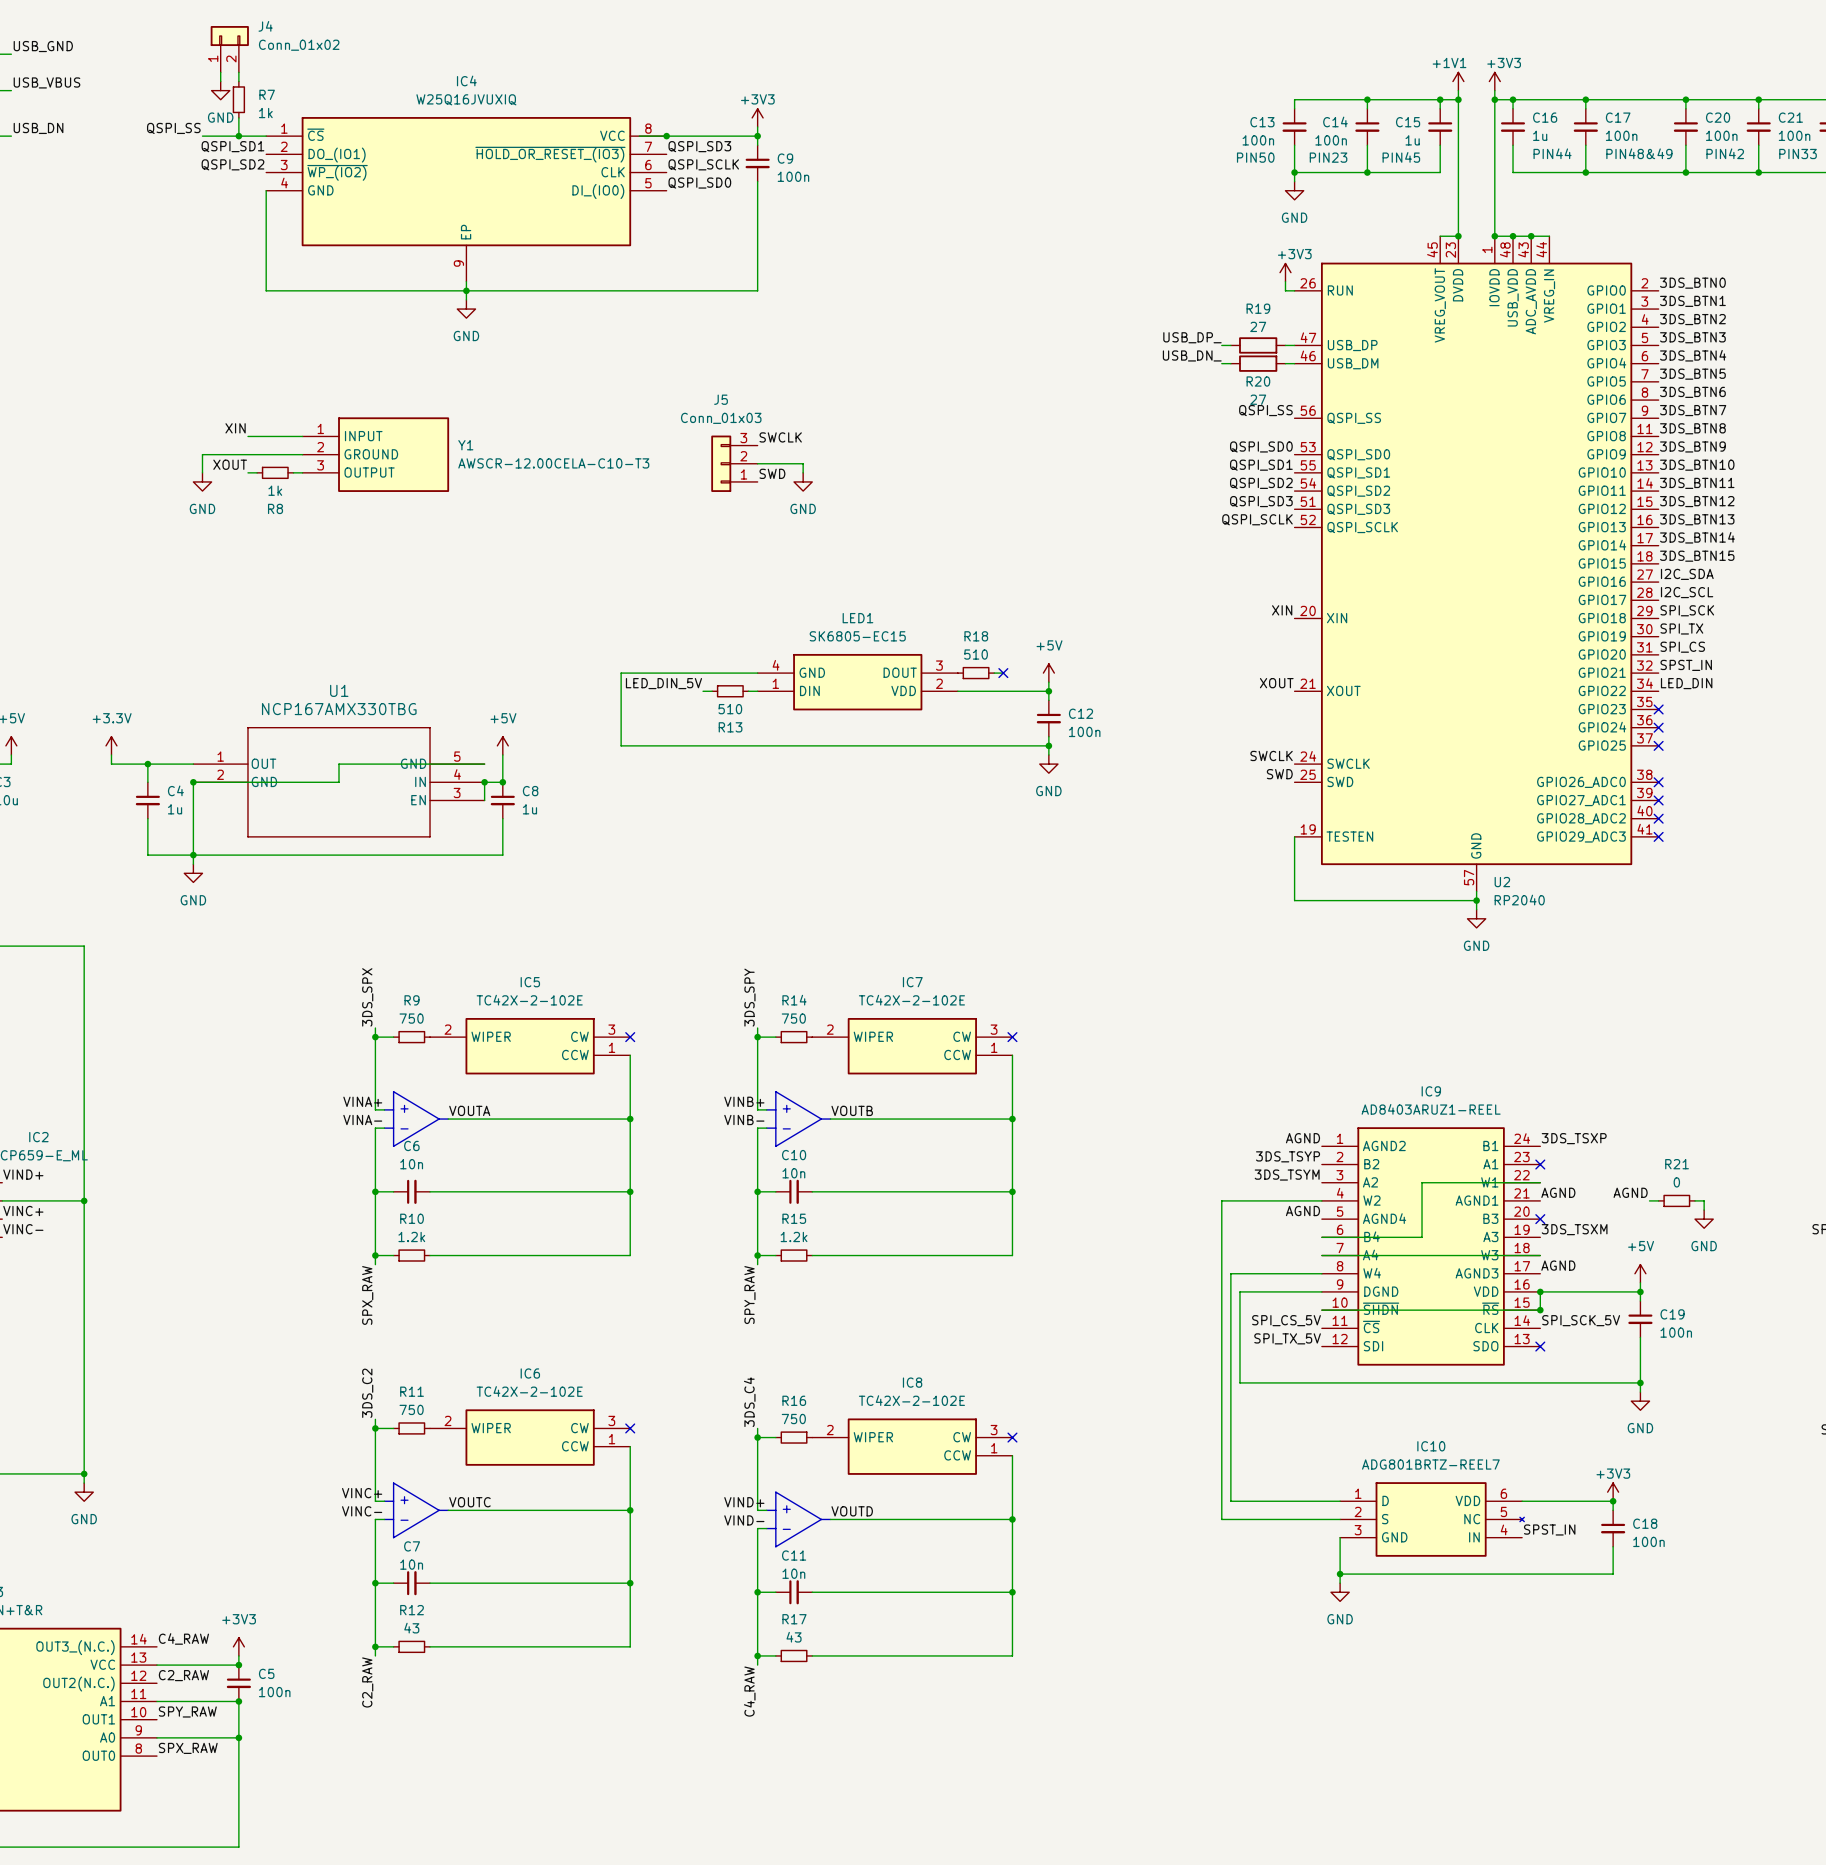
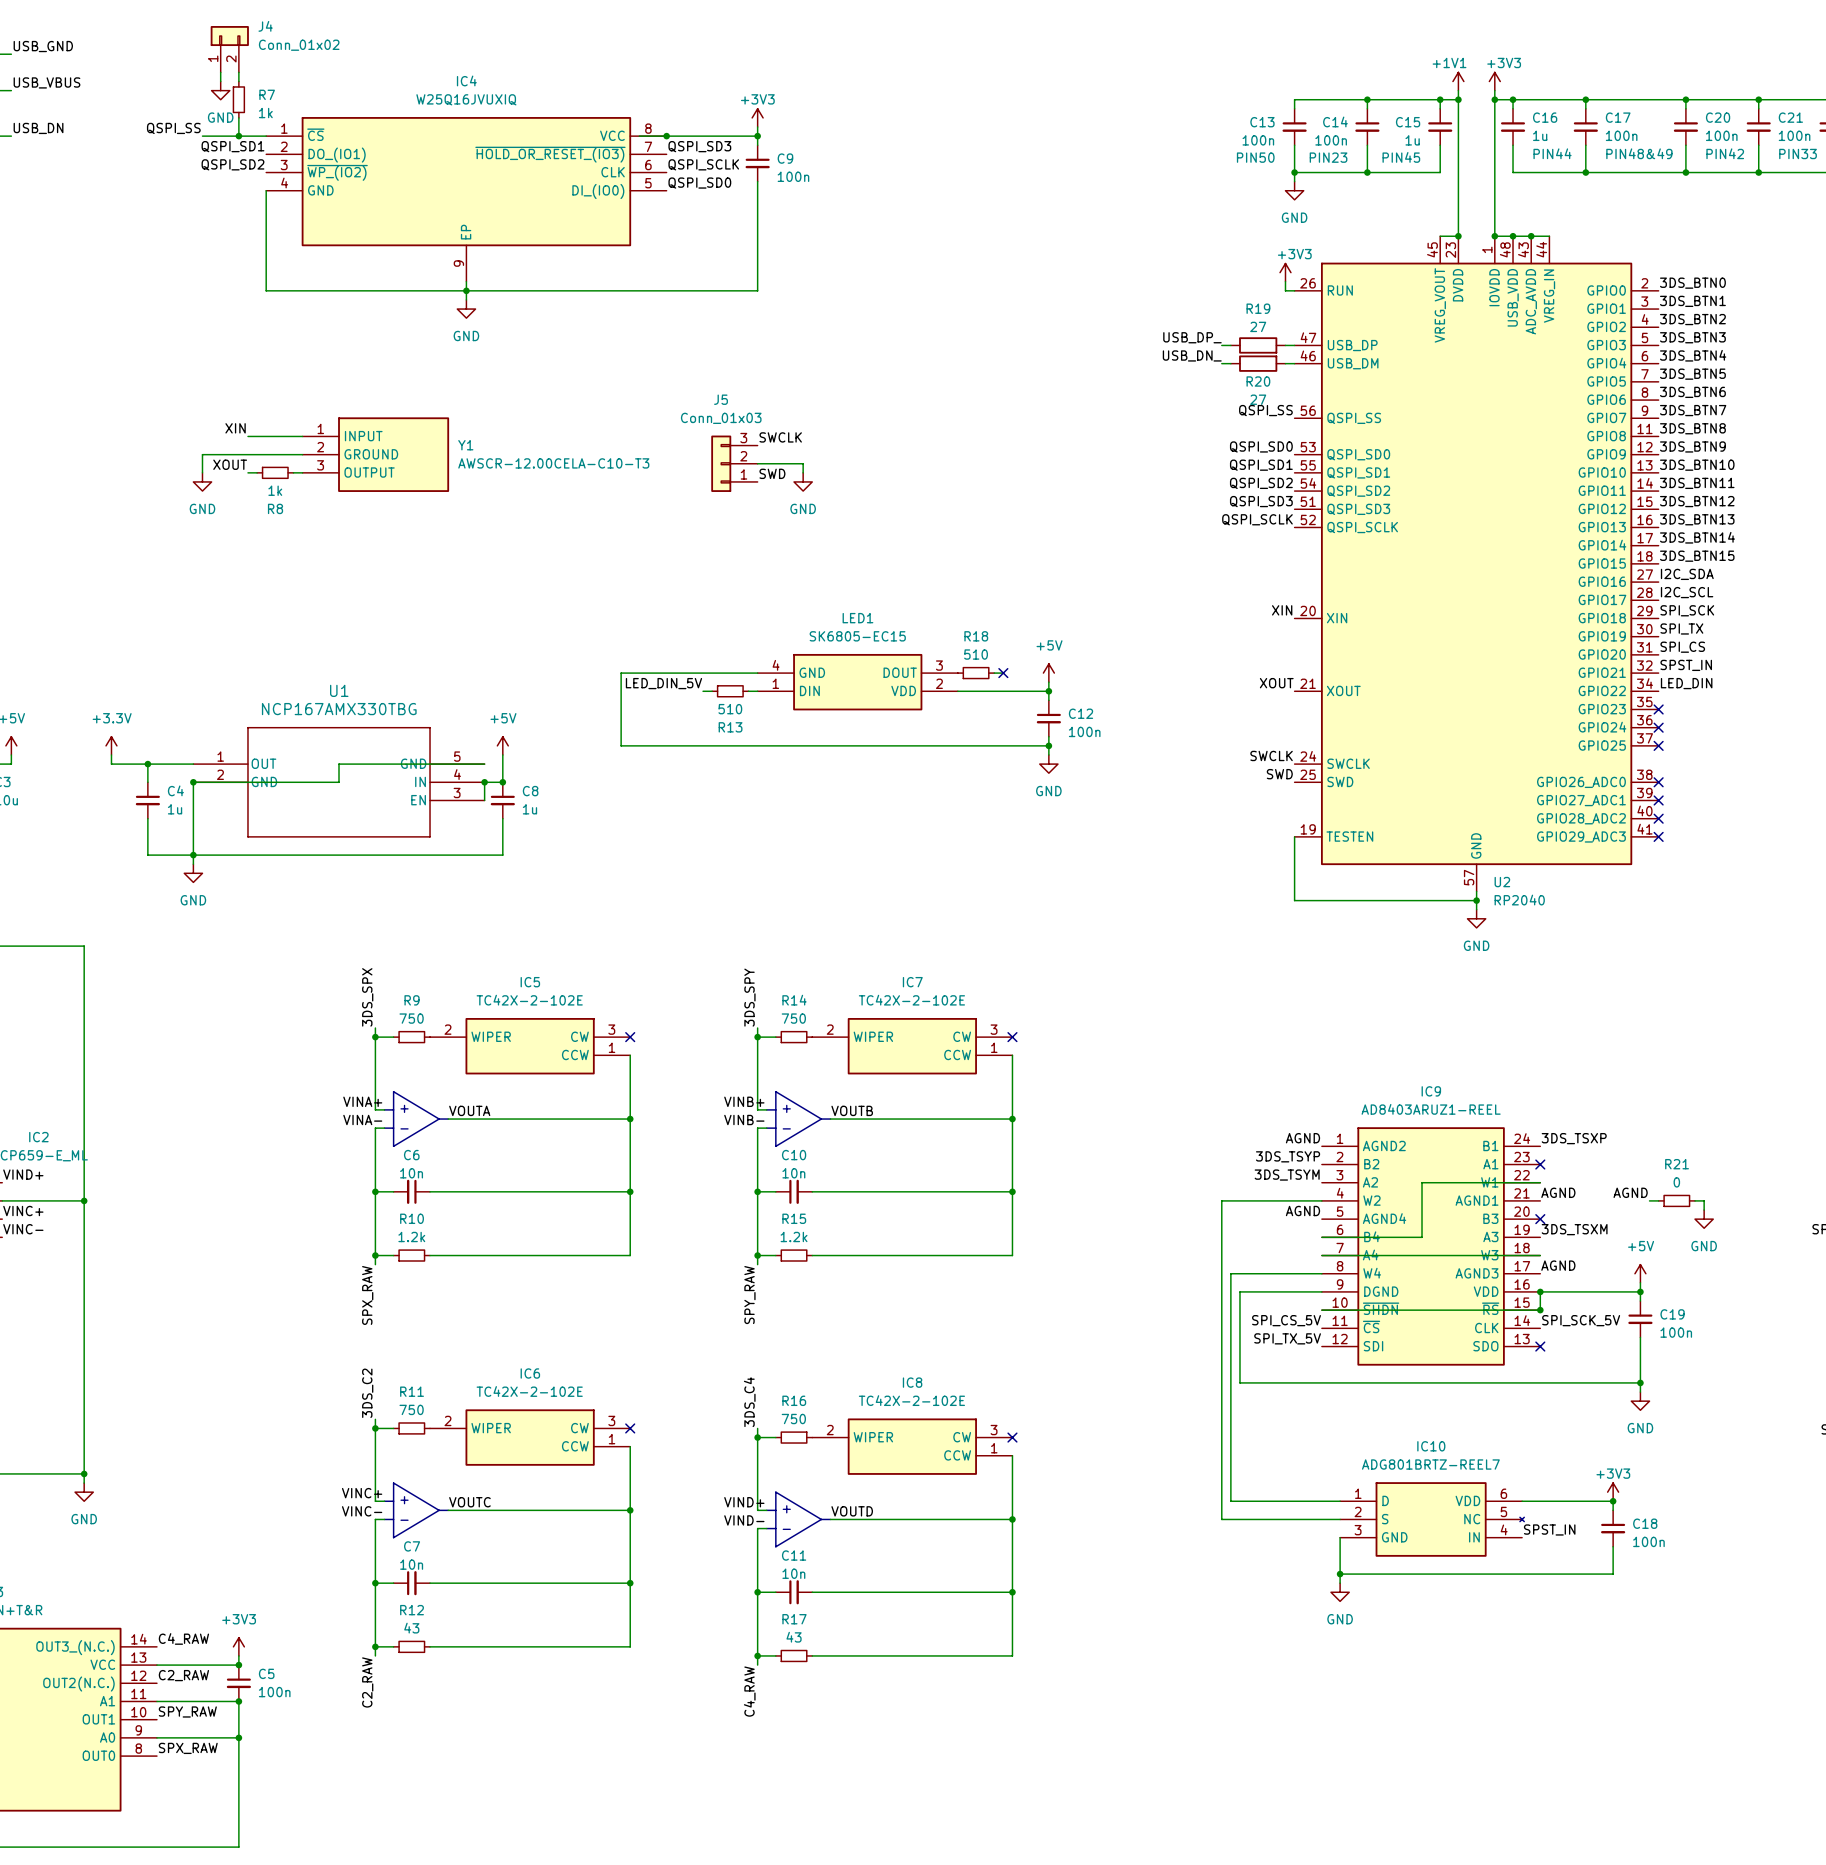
C6 rotation: 0° (411, 1191) -> 180° (411, 1191)

